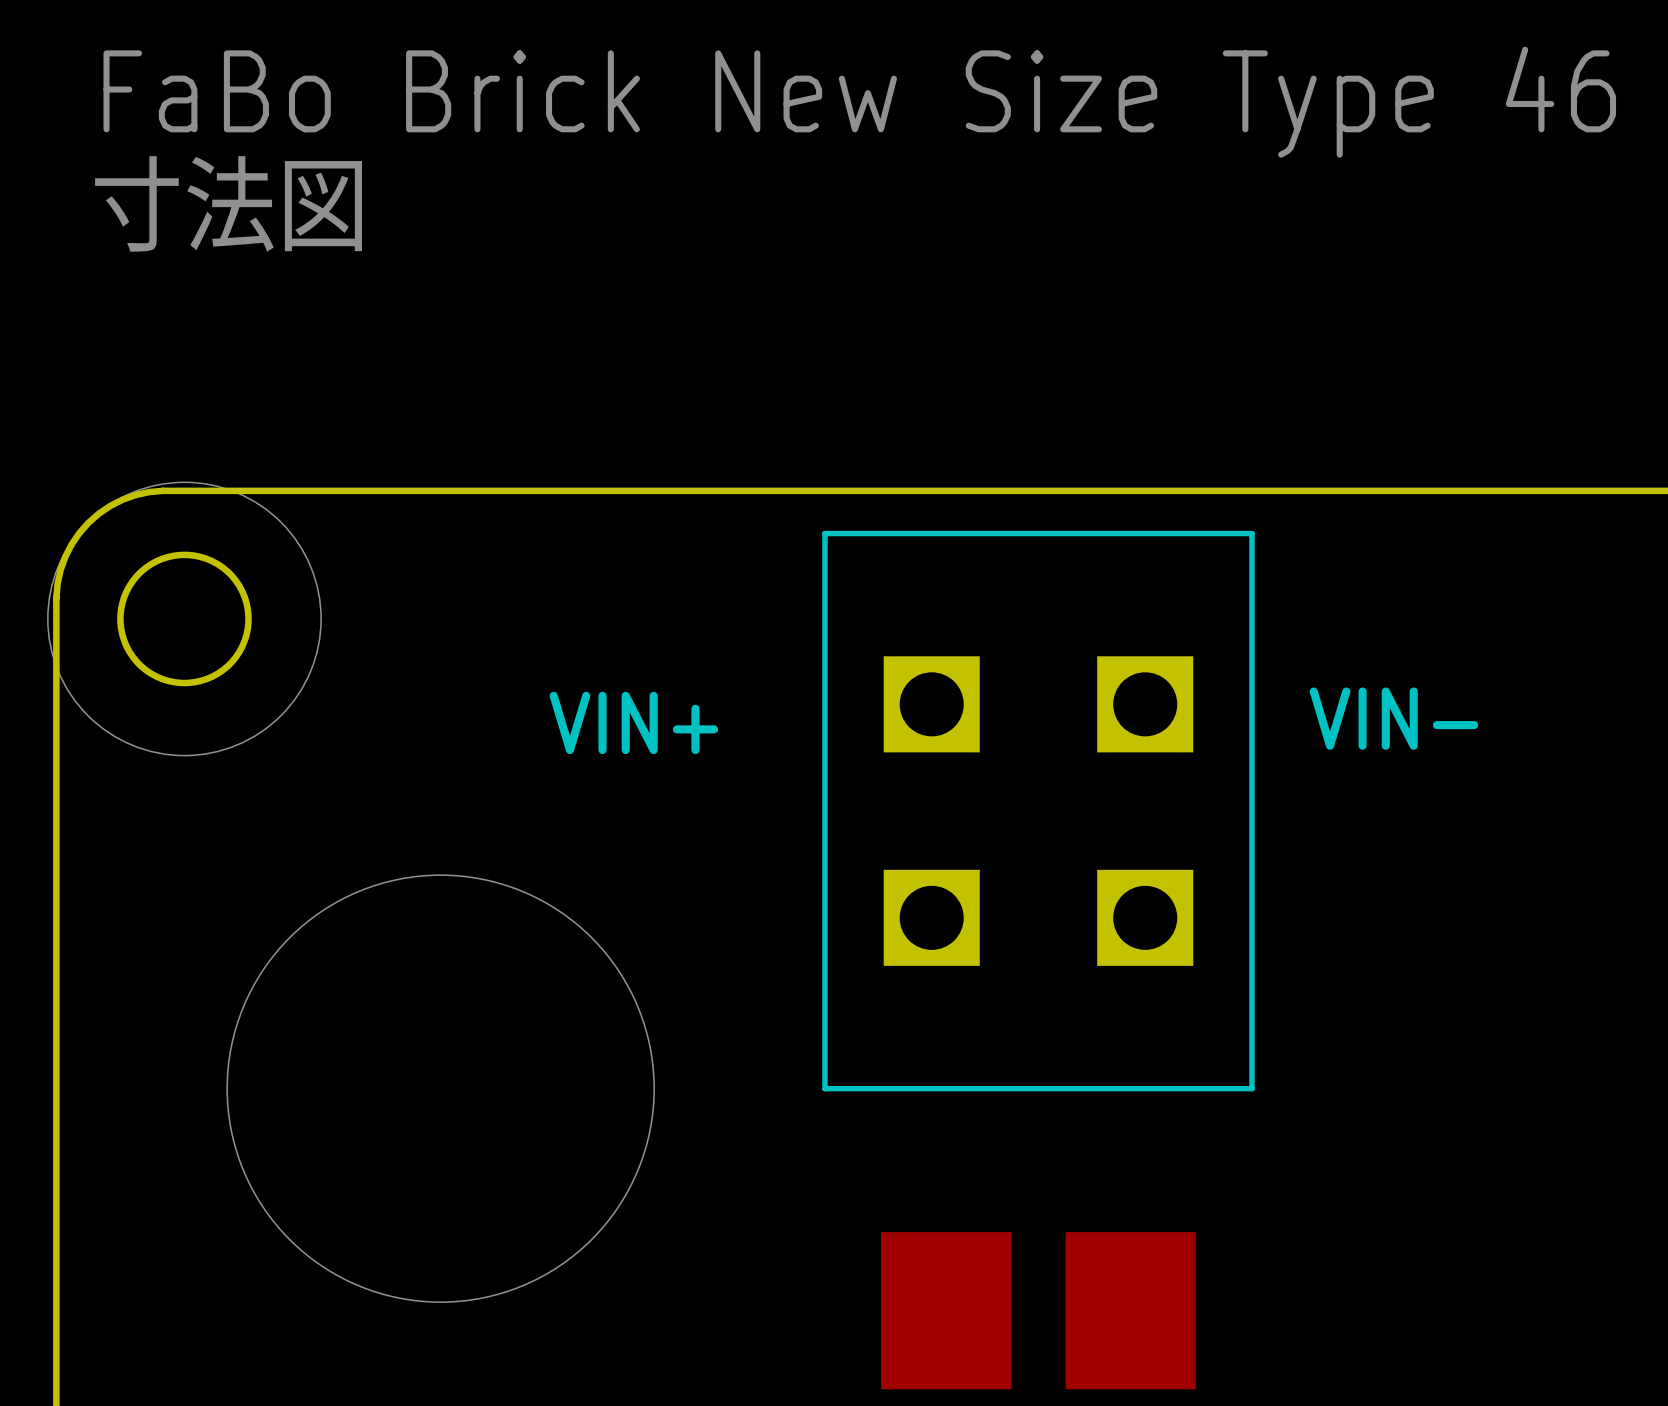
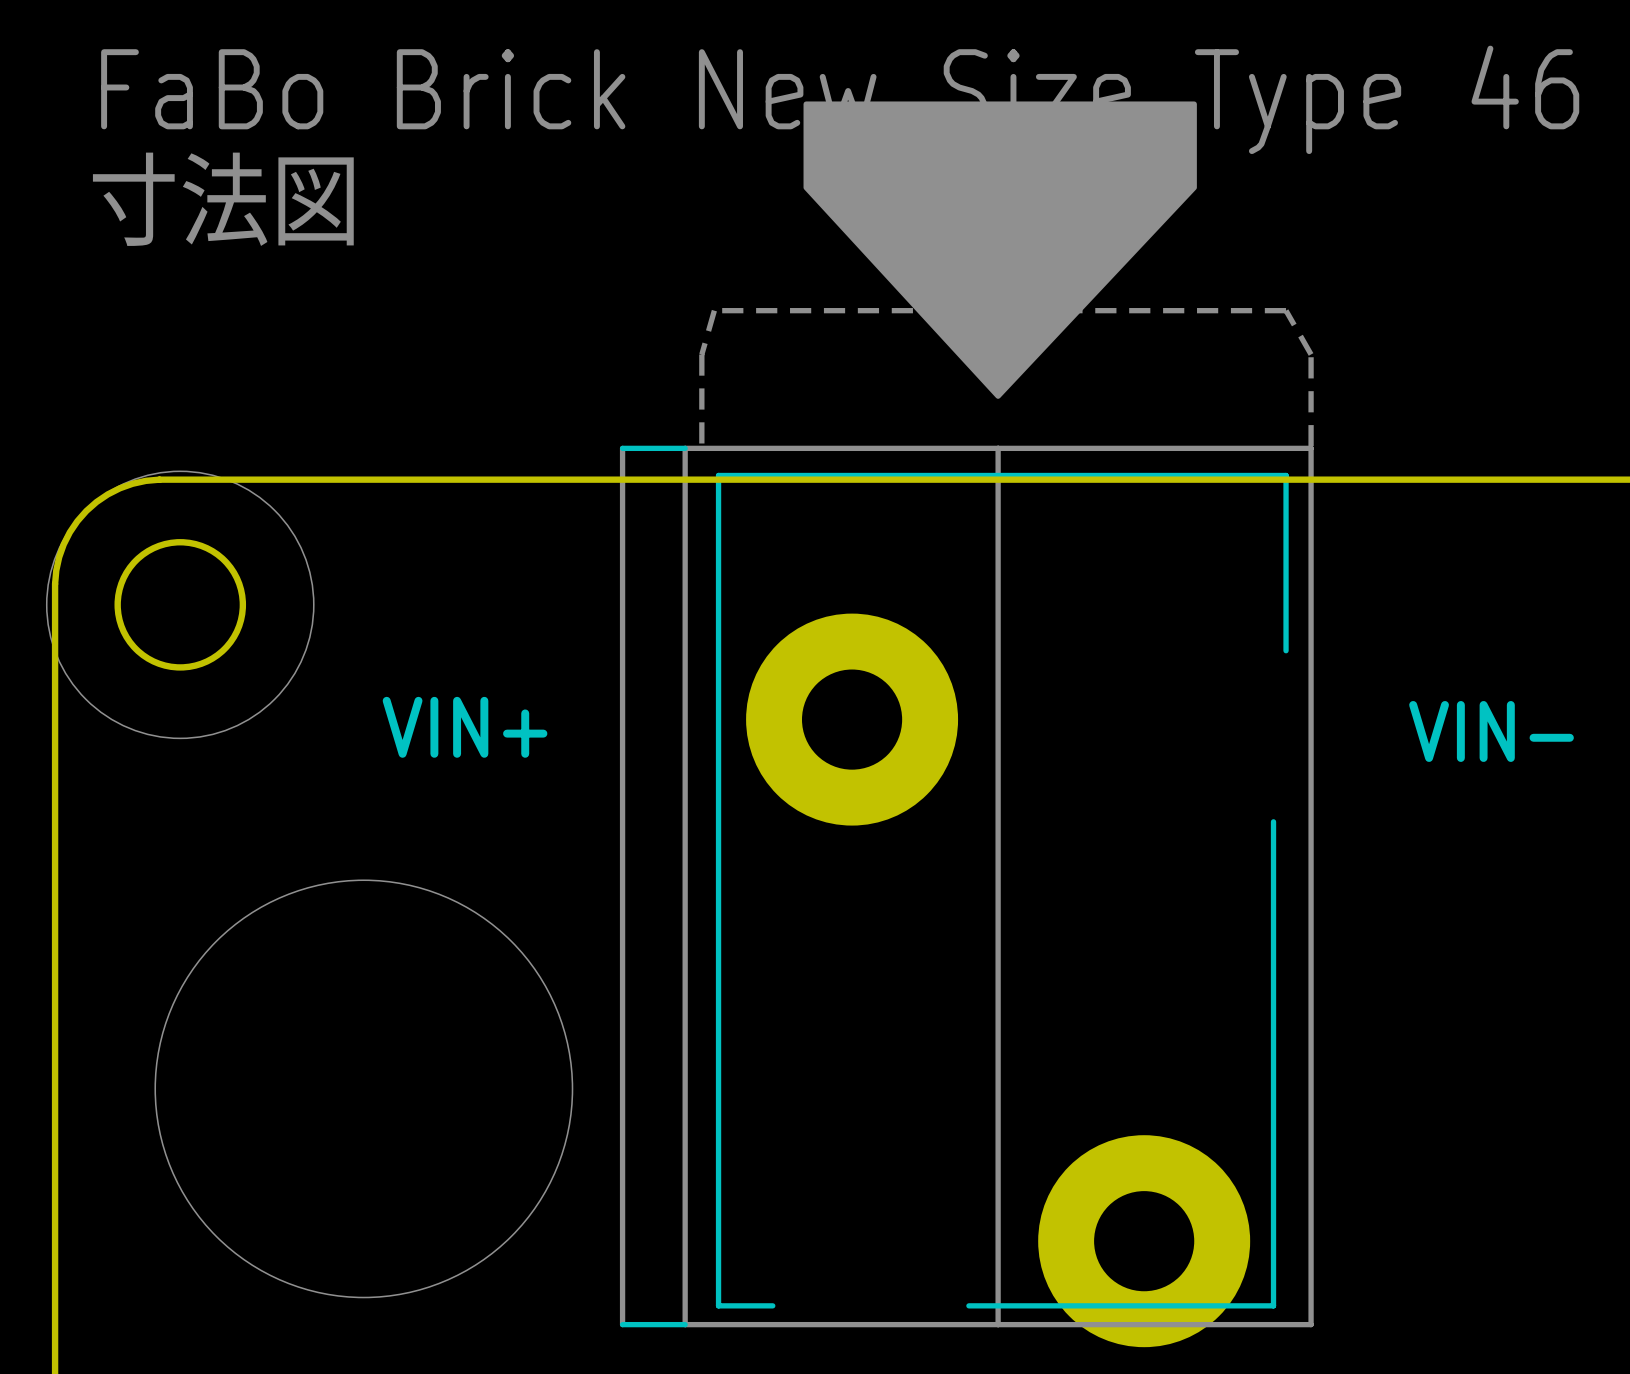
text position: VIN- (1393, 718) -> VIN- (1491, 731)
text position: VIN+ (633, 722) -> VIN+ (465, 727)
part: none -> (966, 724)
part: (1038, 811) -> none
drawing position: (440, 1088) -> (363, 1088)
part: (1038, 1310) -> none

